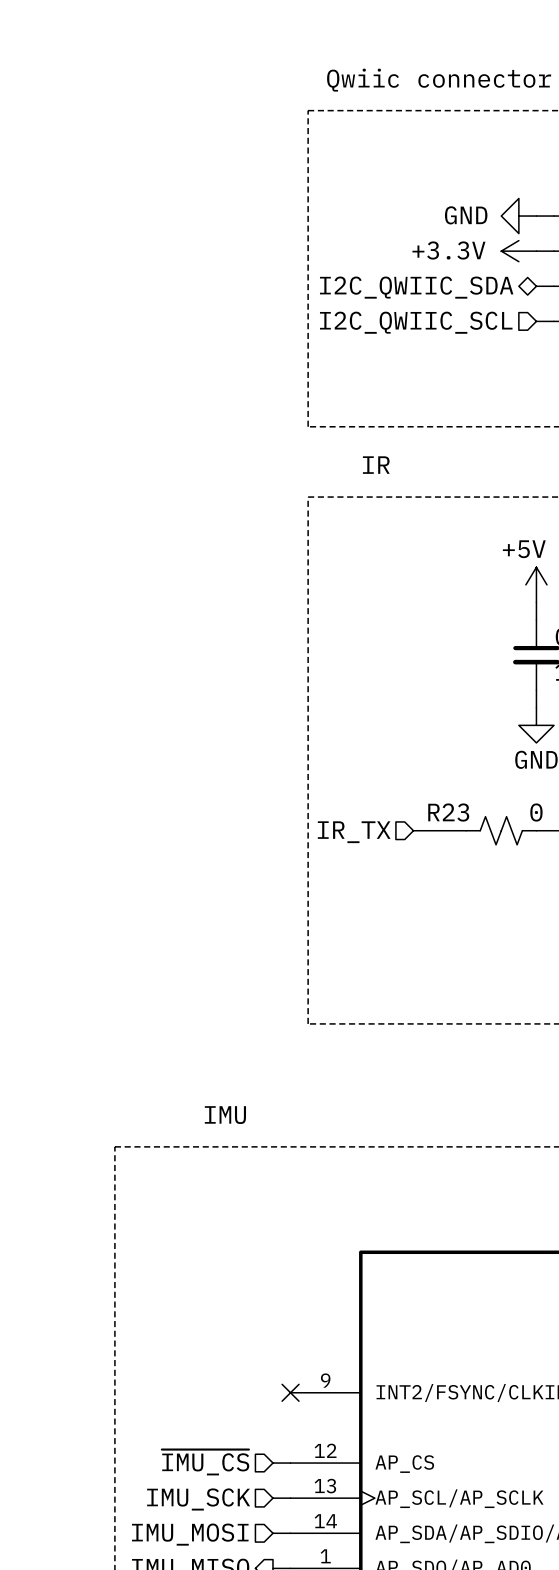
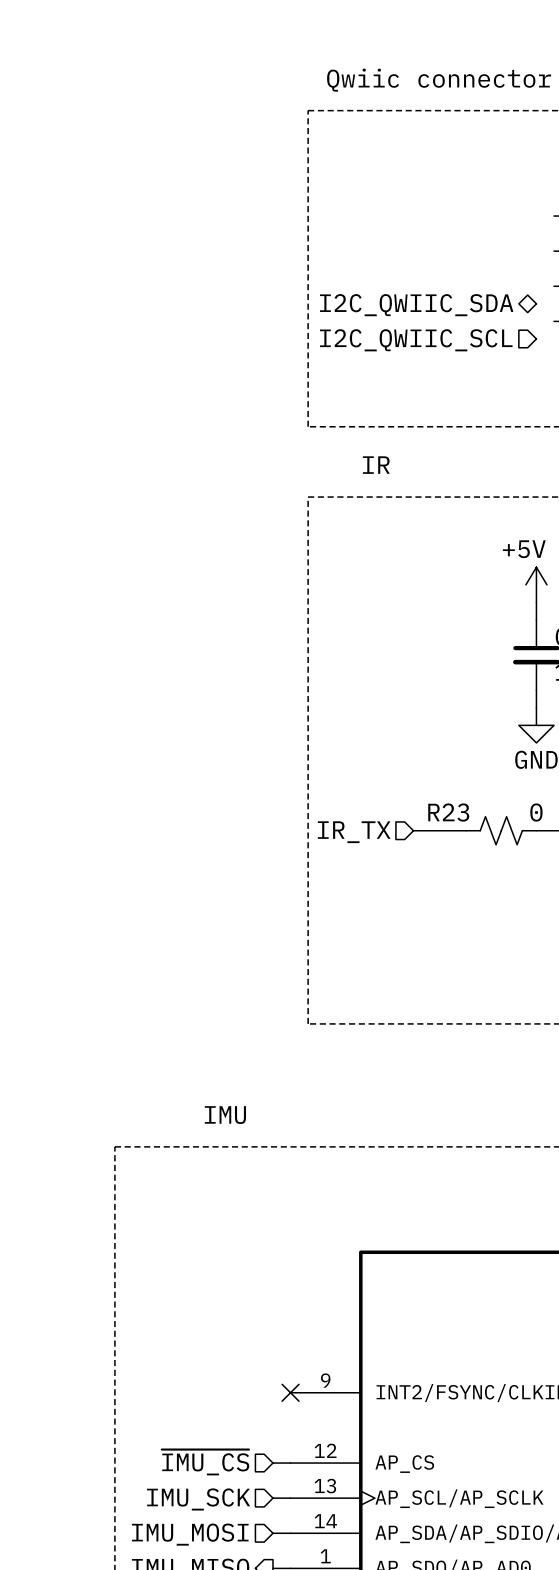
power symbol: GND (518, 216) -> none
wire: (536, 216) (554, 216) -> none
power symbol: +3.3V (518, 251) -> none
wire: (536, 251) (554, 251) -> none
wire: (536, 286) (554, 286) -> none
hierarchical label position: I2C_QWIIC_SDA (416, 287) -> I2C_QWIIC_SDA (416, 305)
wire: (536, 321) (554, 321) -> none
hierarchical label position: I2C_QWIIC_SCL (416, 322) -> I2C_QWIIC_SCL (416, 340)

